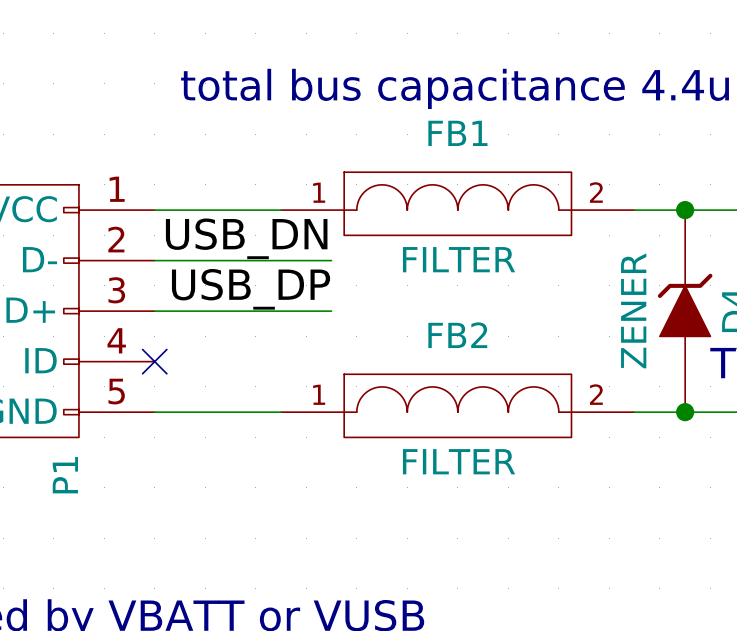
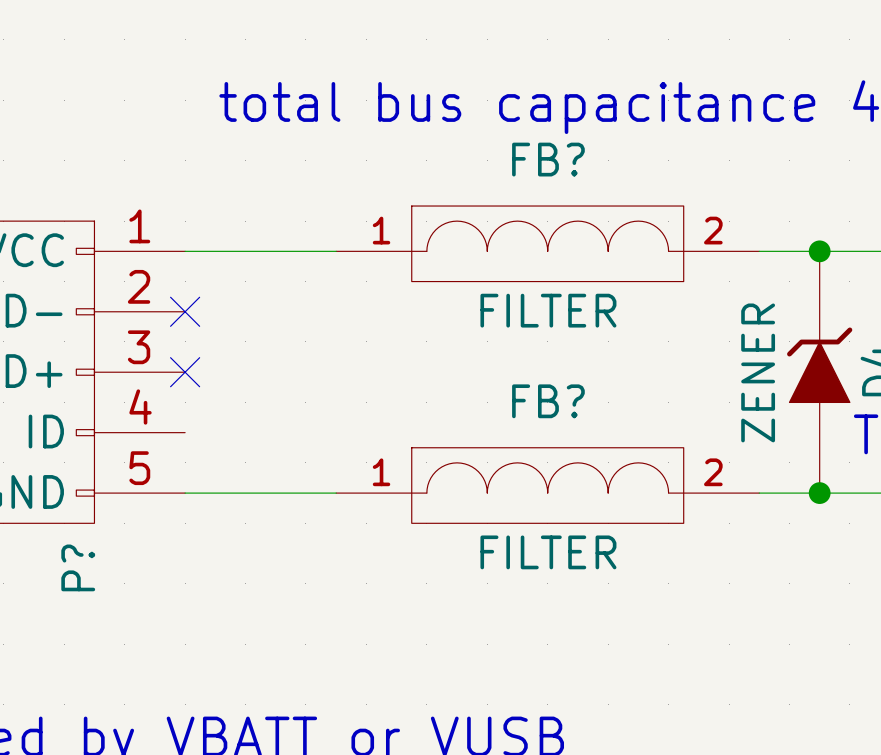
FB1 name: FB1 (457, 133) -> FB? (548, 159)
label: USB_DN (246, 238) -> none
wire: (154, 260) (331, 260) -> none
no-connect mark: none -> (185, 311)
label: USB_DP (251, 289) -> none
wire: (154, 311) (331, 311) -> none
no-connect mark: none -> (185, 372)
FB2 name: FB2 (457, 335) -> FB? (548, 401)
no-connect mark: (154, 361) -> none
P1 name: P1 (65, 475) -> P? (78, 567)

